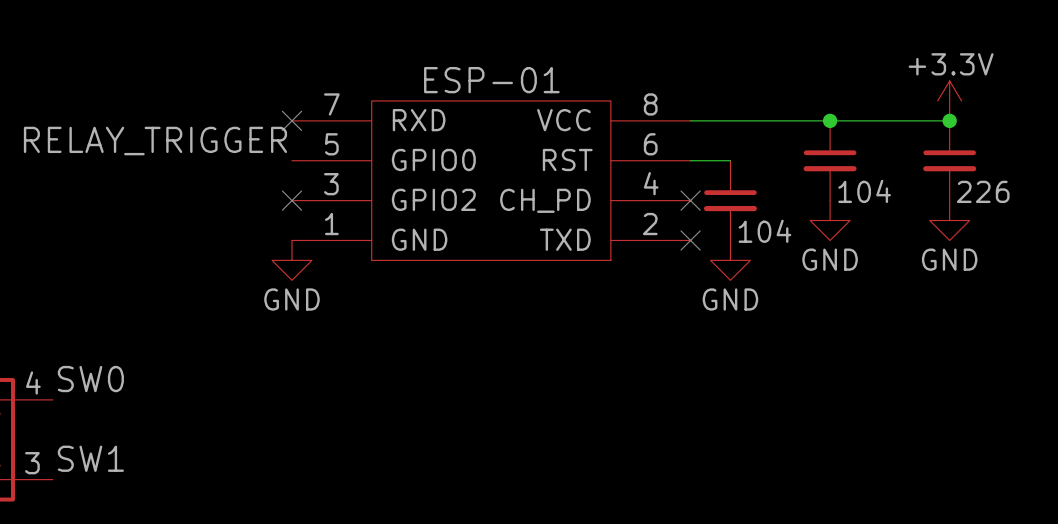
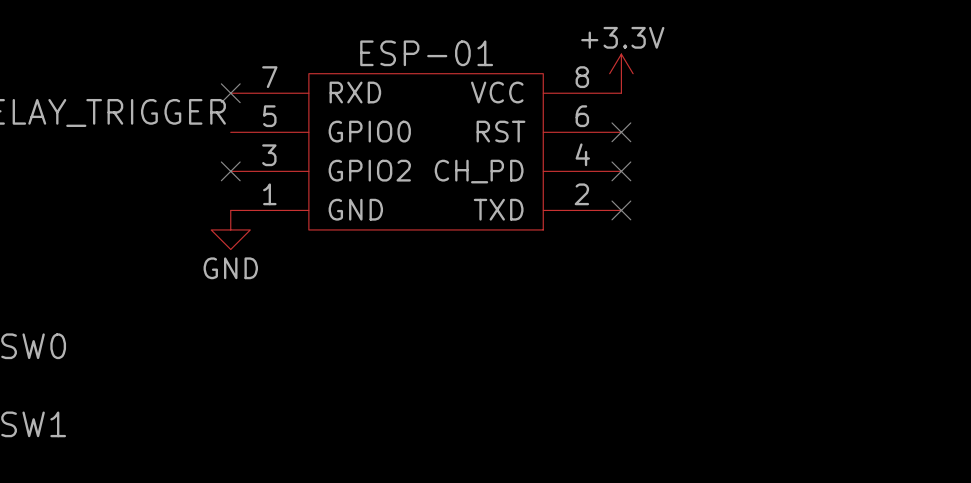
power symbol position: +3.3V (949, 100) -> +3.3V (621, 73)
wire: (690, 120) (949, 120) -> none
junction: (830, 120) -> none
junction: (949, 120) -> none
wire: (690, 160) (730, 160) -> none
no-connect mark: none -> (621, 132)
part: 104 (830, 160) -> none
part: 226 (949, 160) -> none
part: 104 (730, 200) -> none
power symbol: GND (830, 220) -> none
power symbol: GND (949, 220) -> none
power symbol: GND (730, 260) -> none

